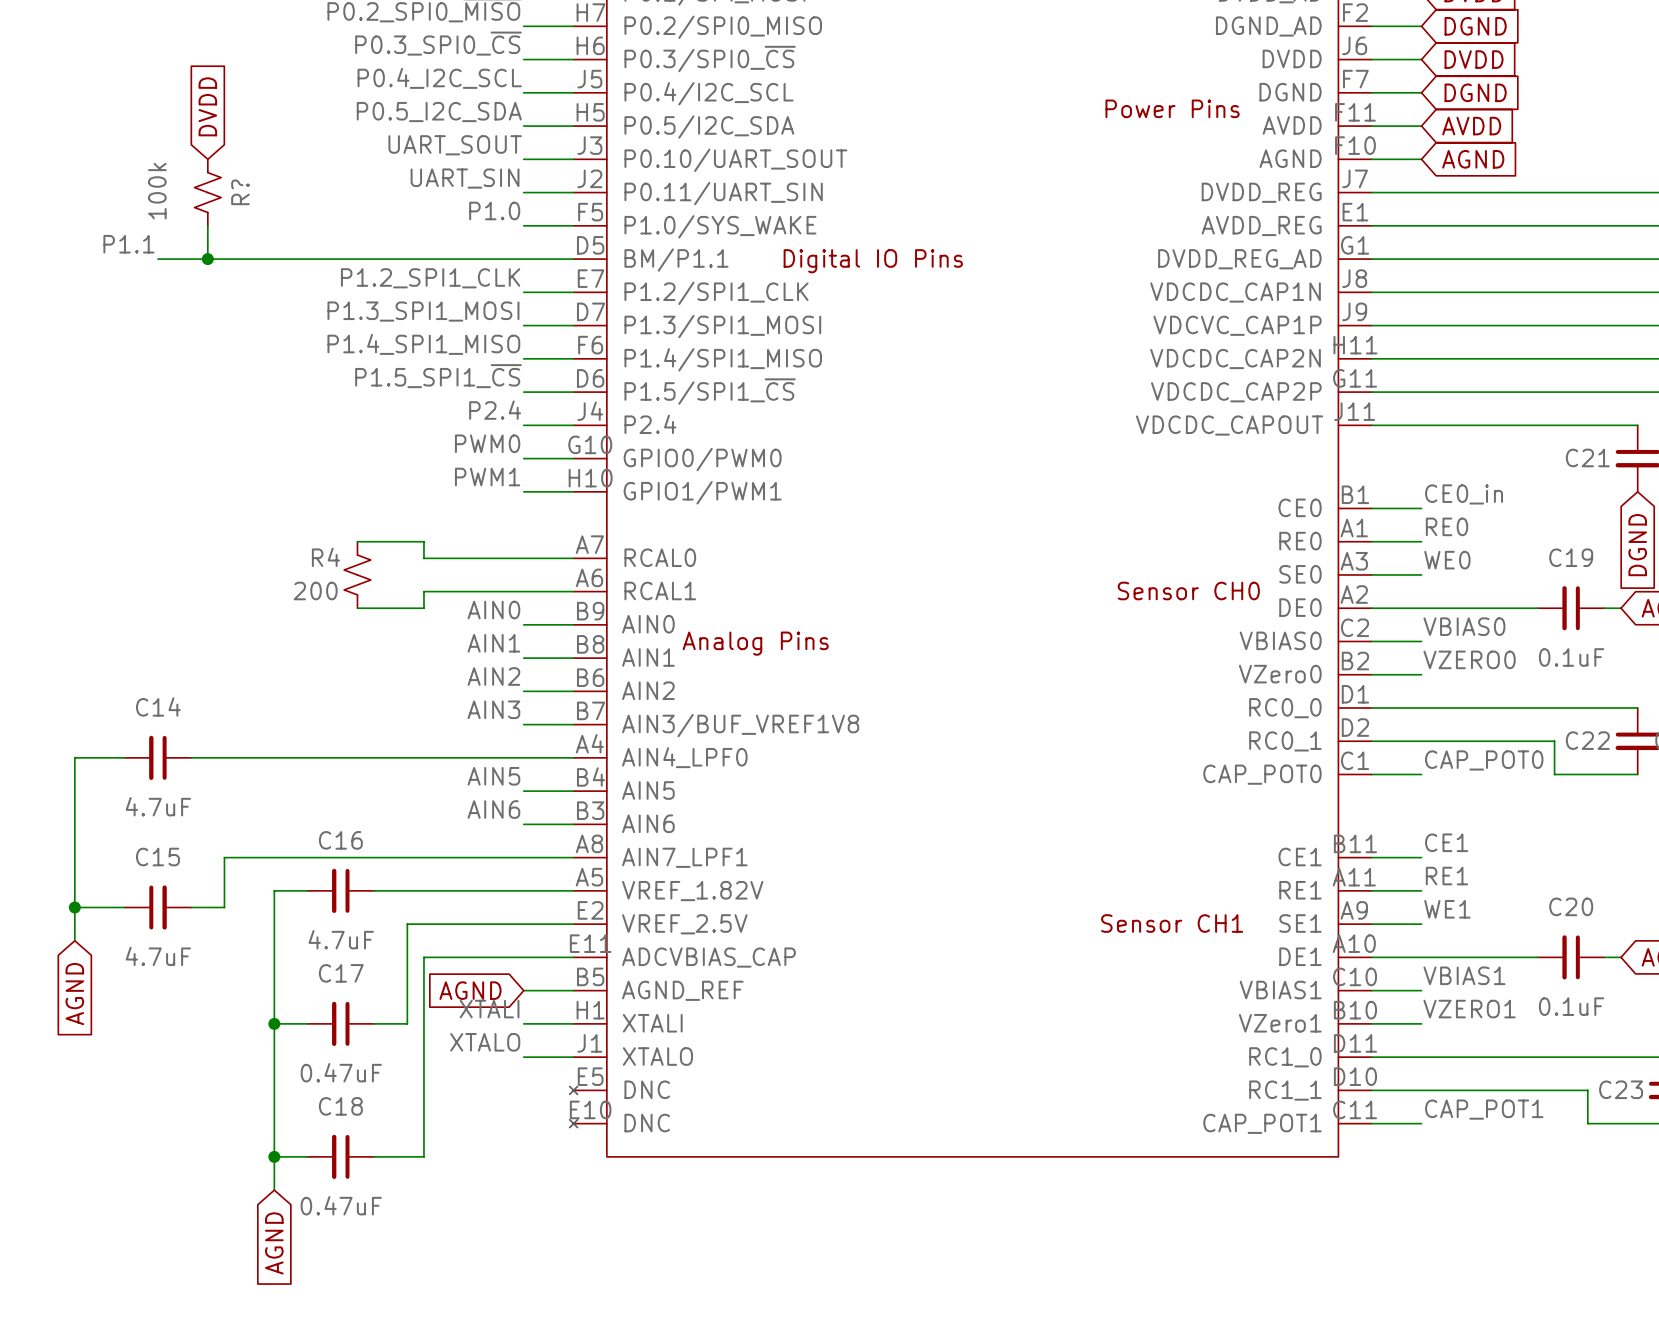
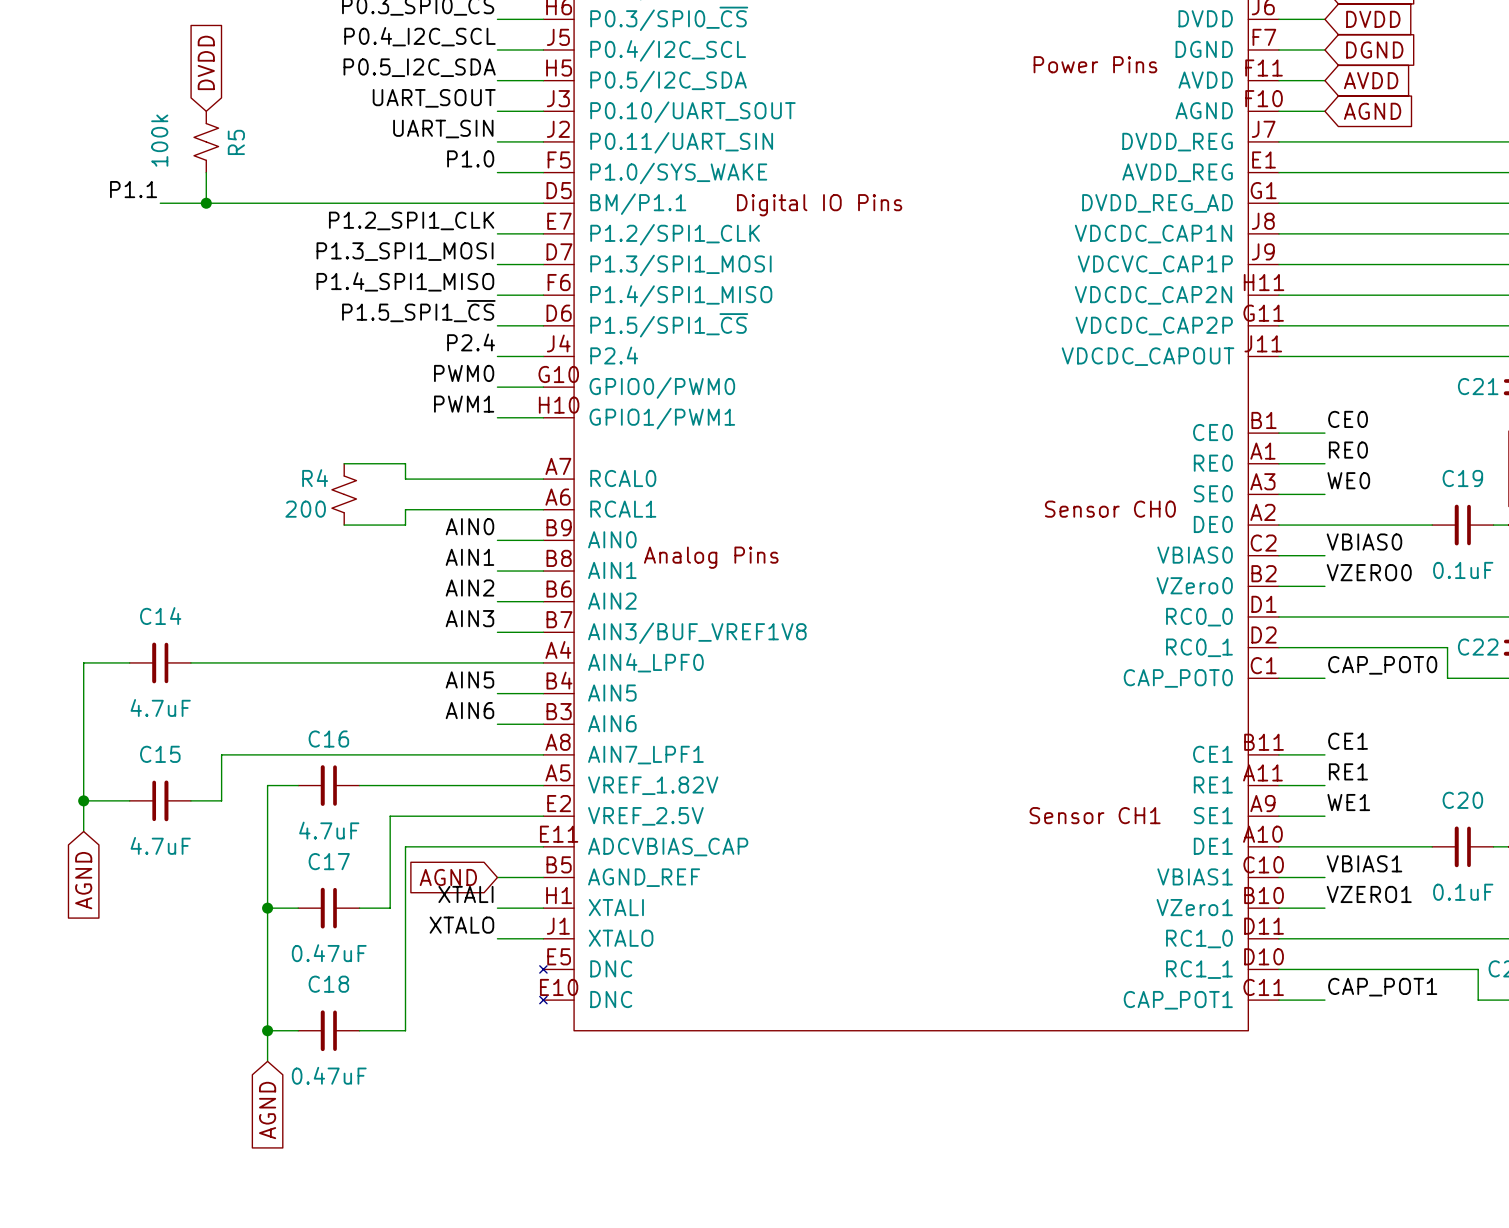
R? name: R? (240, 192) -> R5 (236, 142)
label: CE0_in (1464, 494) -> CE0 (1348, 419)

